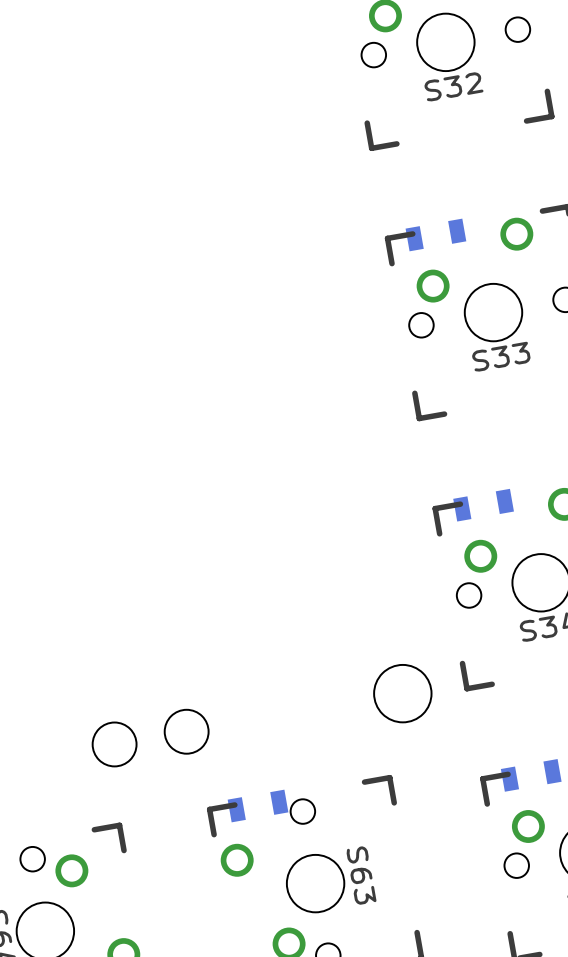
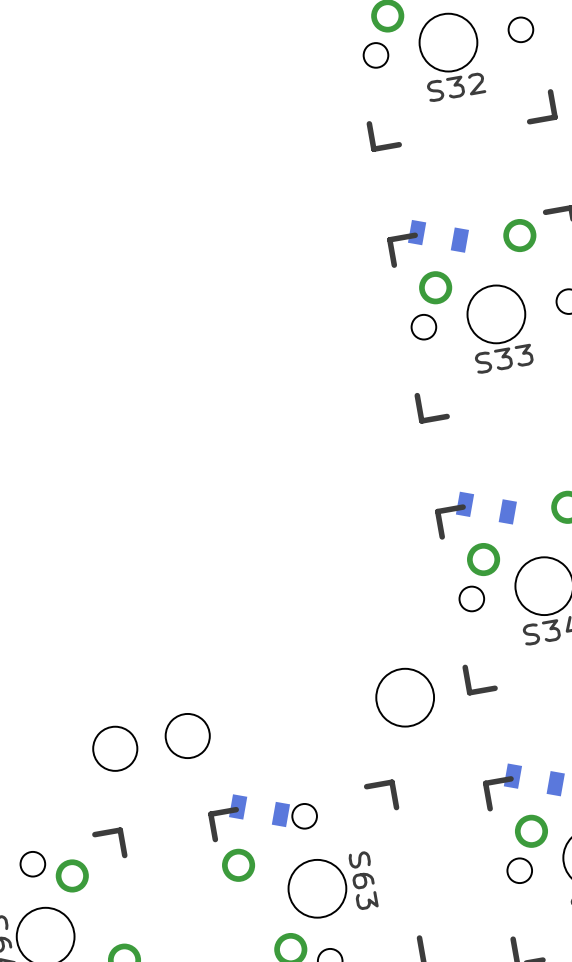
part rotation: 0° (435, 234) -> 20° clockwise (438, 236)
part rotation: 0° (483, 505) -> 20° clockwise (486, 508)
part rotation: 0° (531, 775) -> 20° clockwise (534, 779)
part rotation: 0° (258, 806) -> 20° clockwise (259, 810)

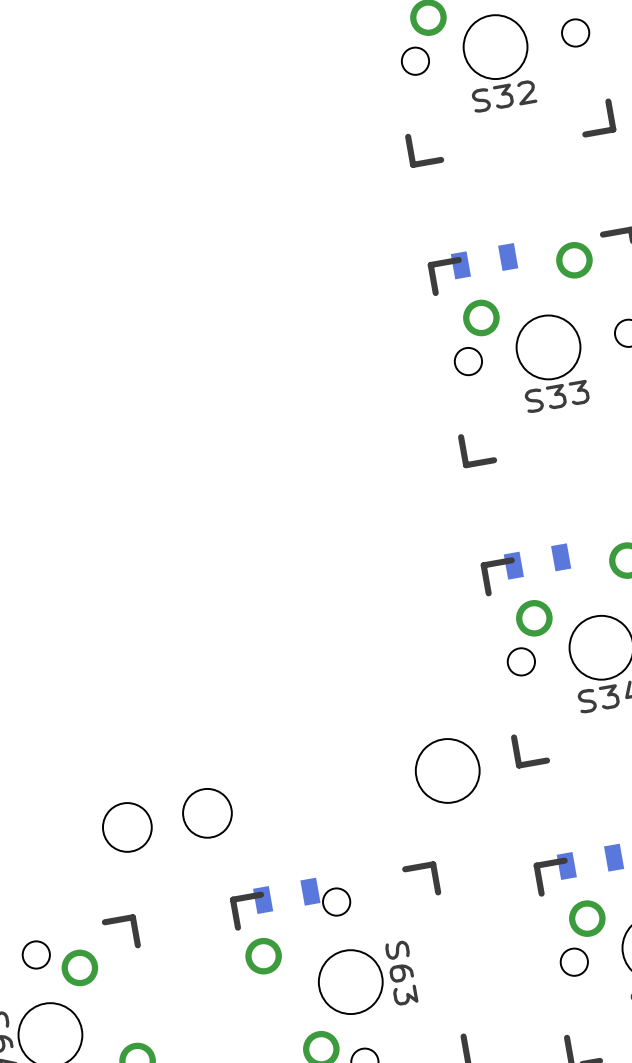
part rotation: 0° (438, 236) -> 20° counterclockwise (484, 261)
part rotation: 0° (486, 508) -> 20° counterclockwise (537, 561)
part rotation: 0° (534, 779) -> 20° counterclockwise (590, 861)
part rotation: 0° (259, 810) -> 20° counterclockwise (286, 895)

